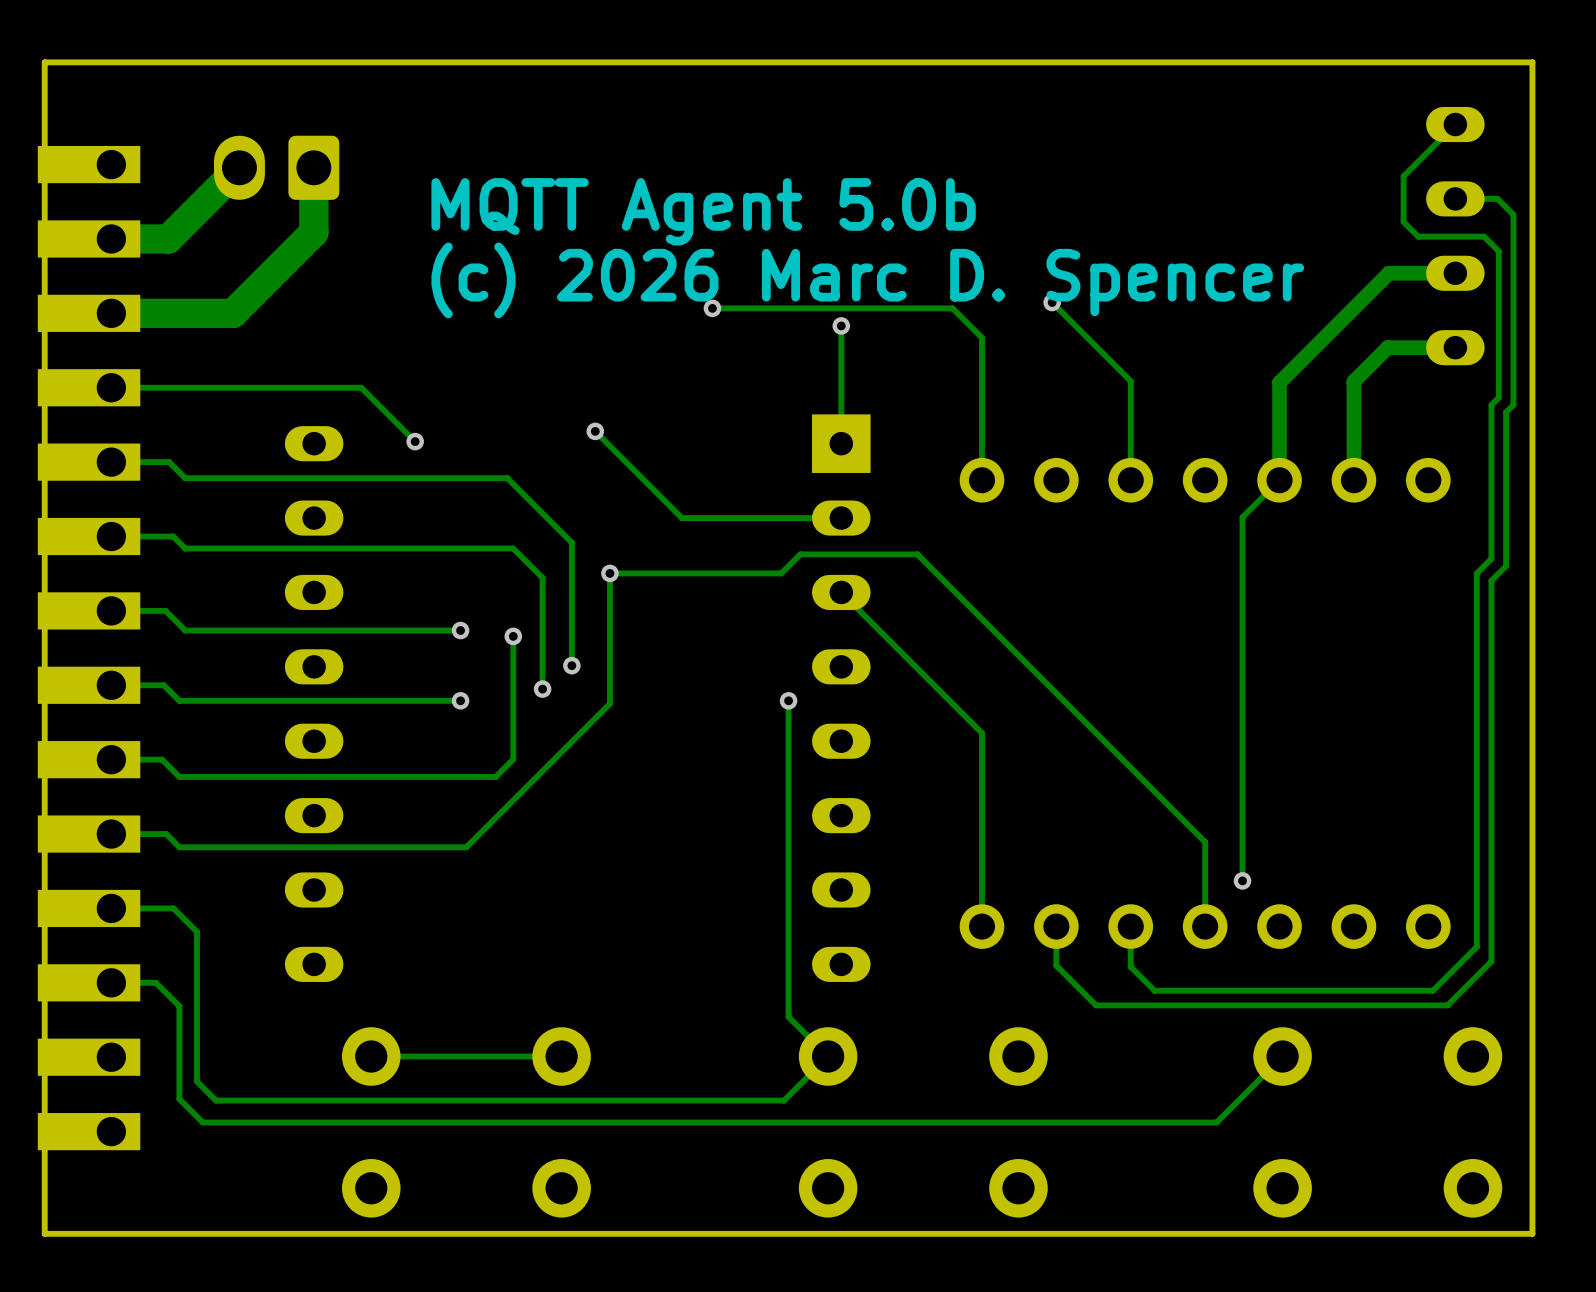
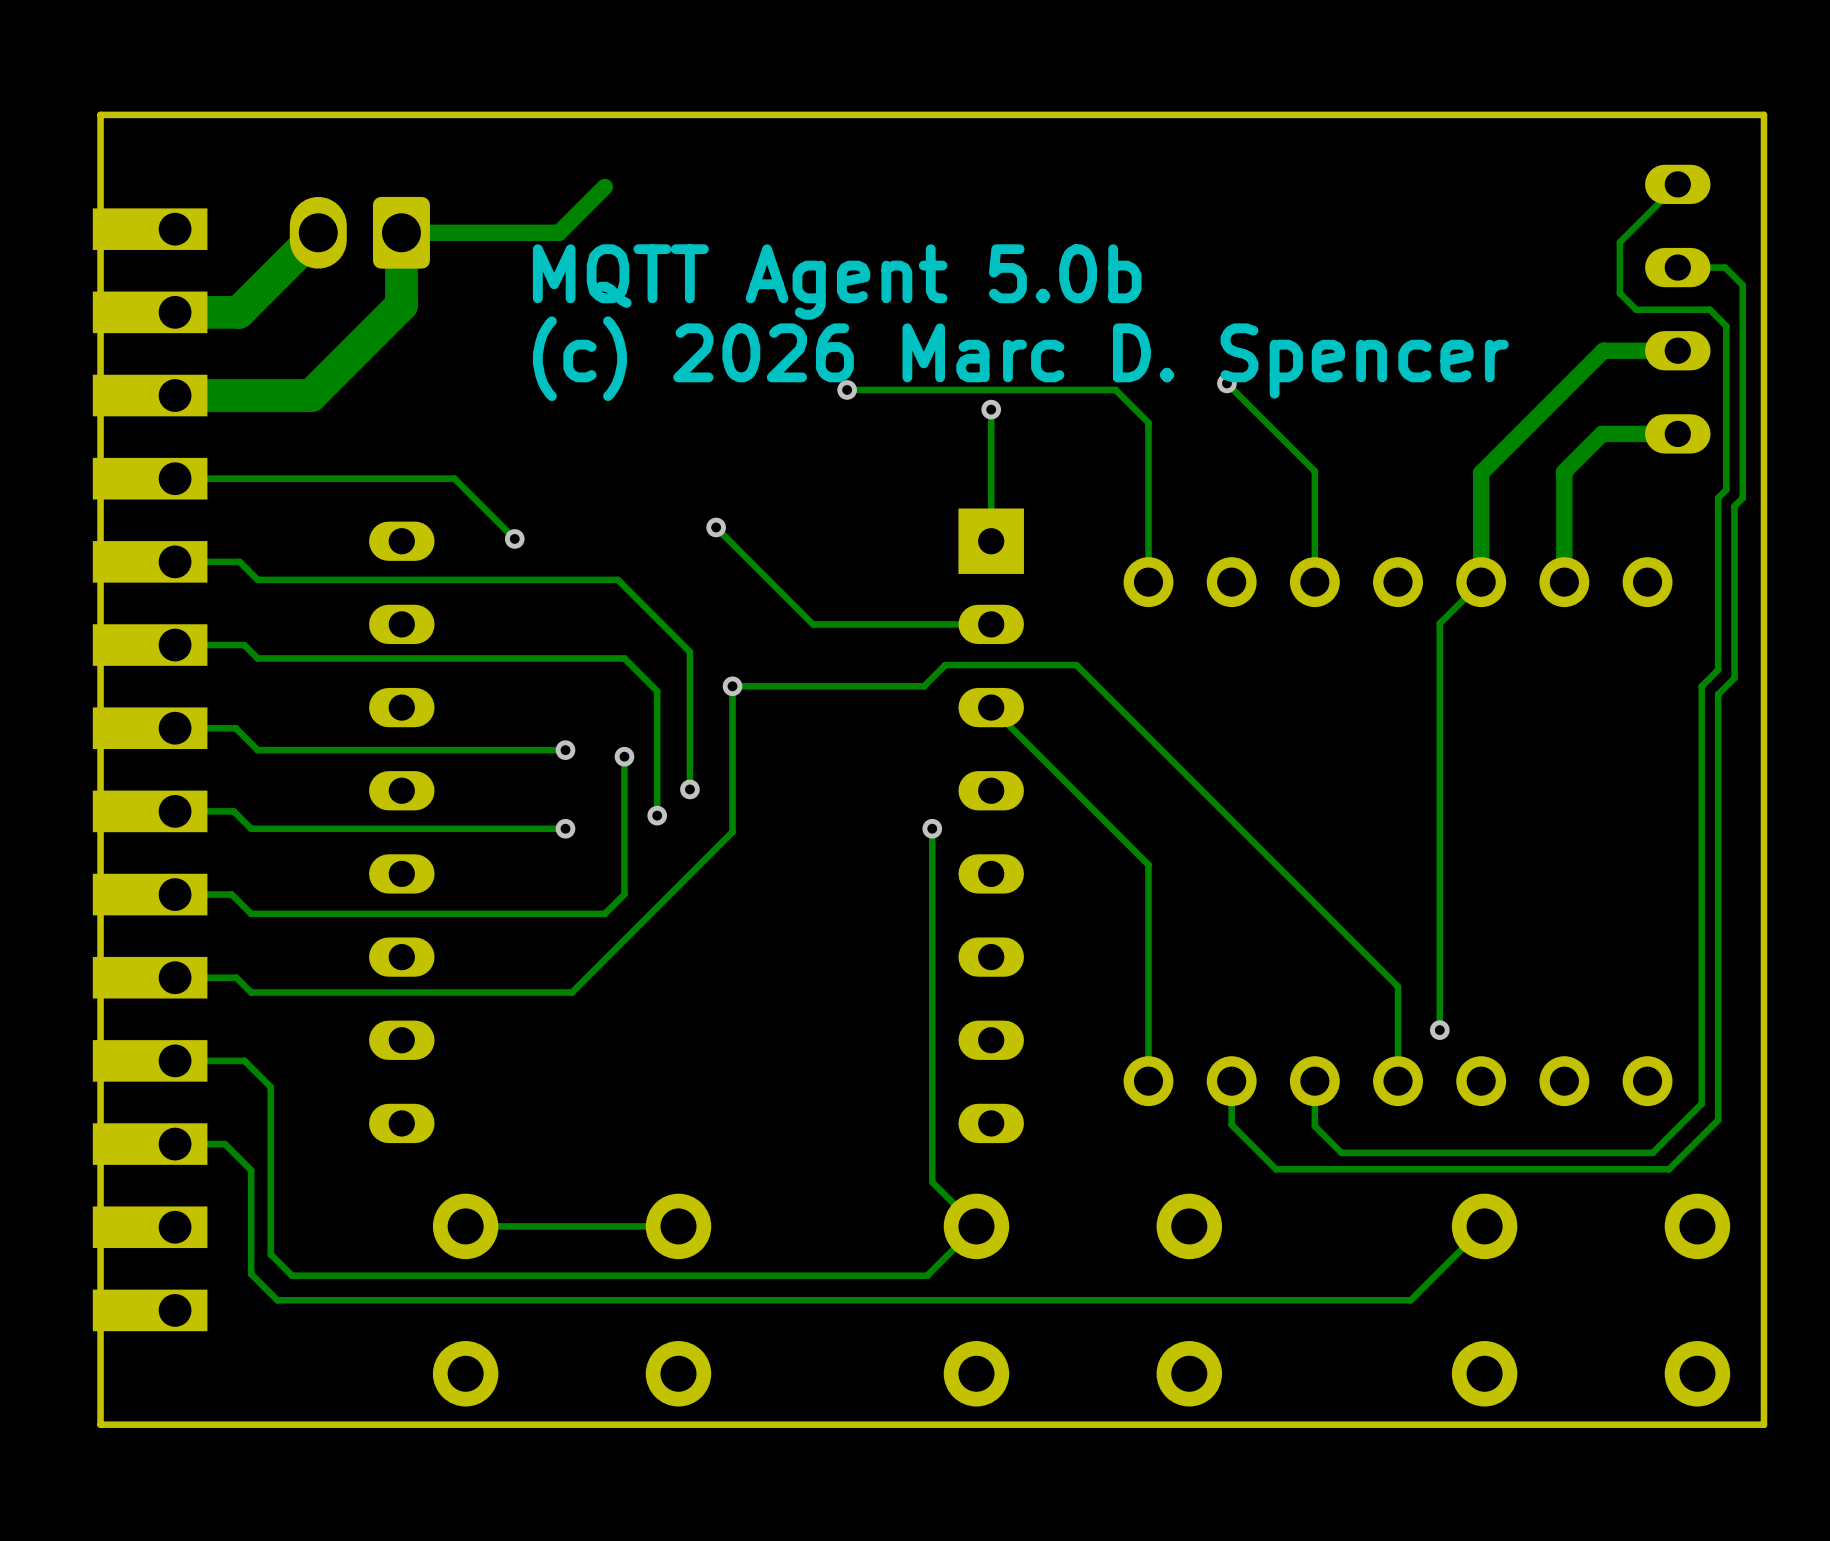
track: none -> (604, 186) (558, 232) (401, 232)

